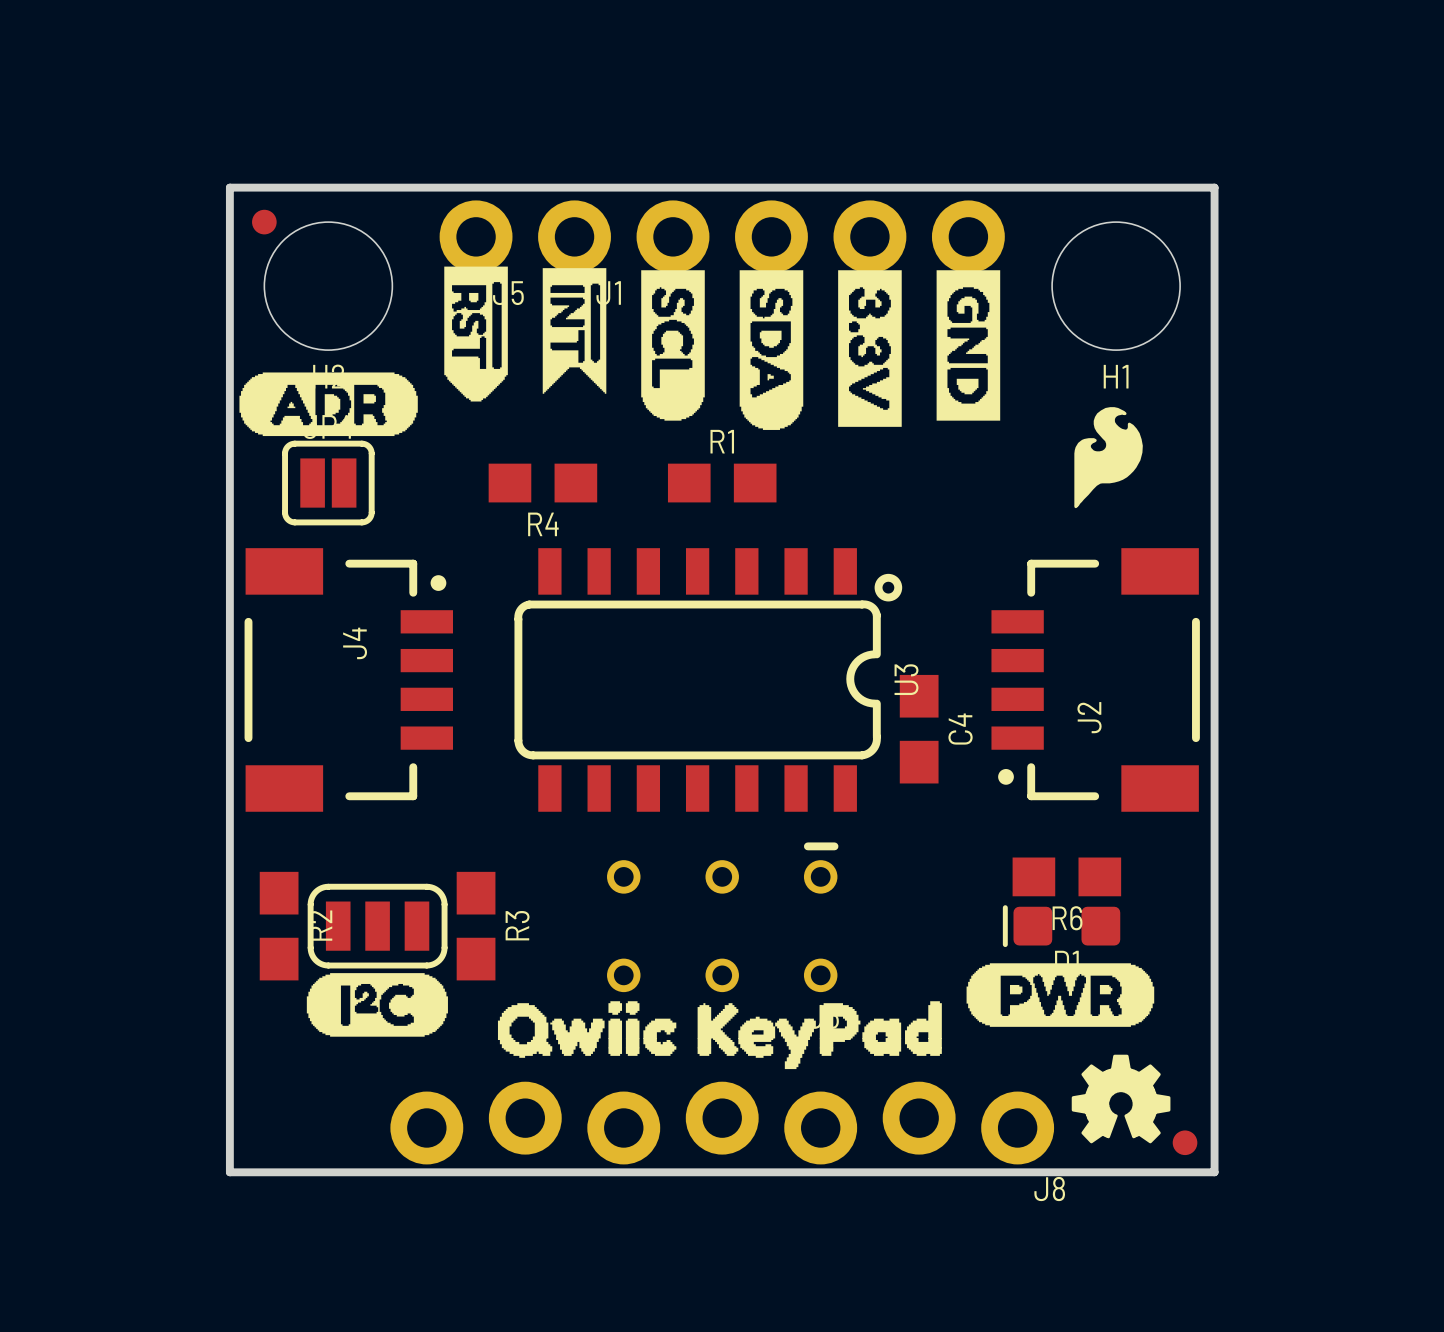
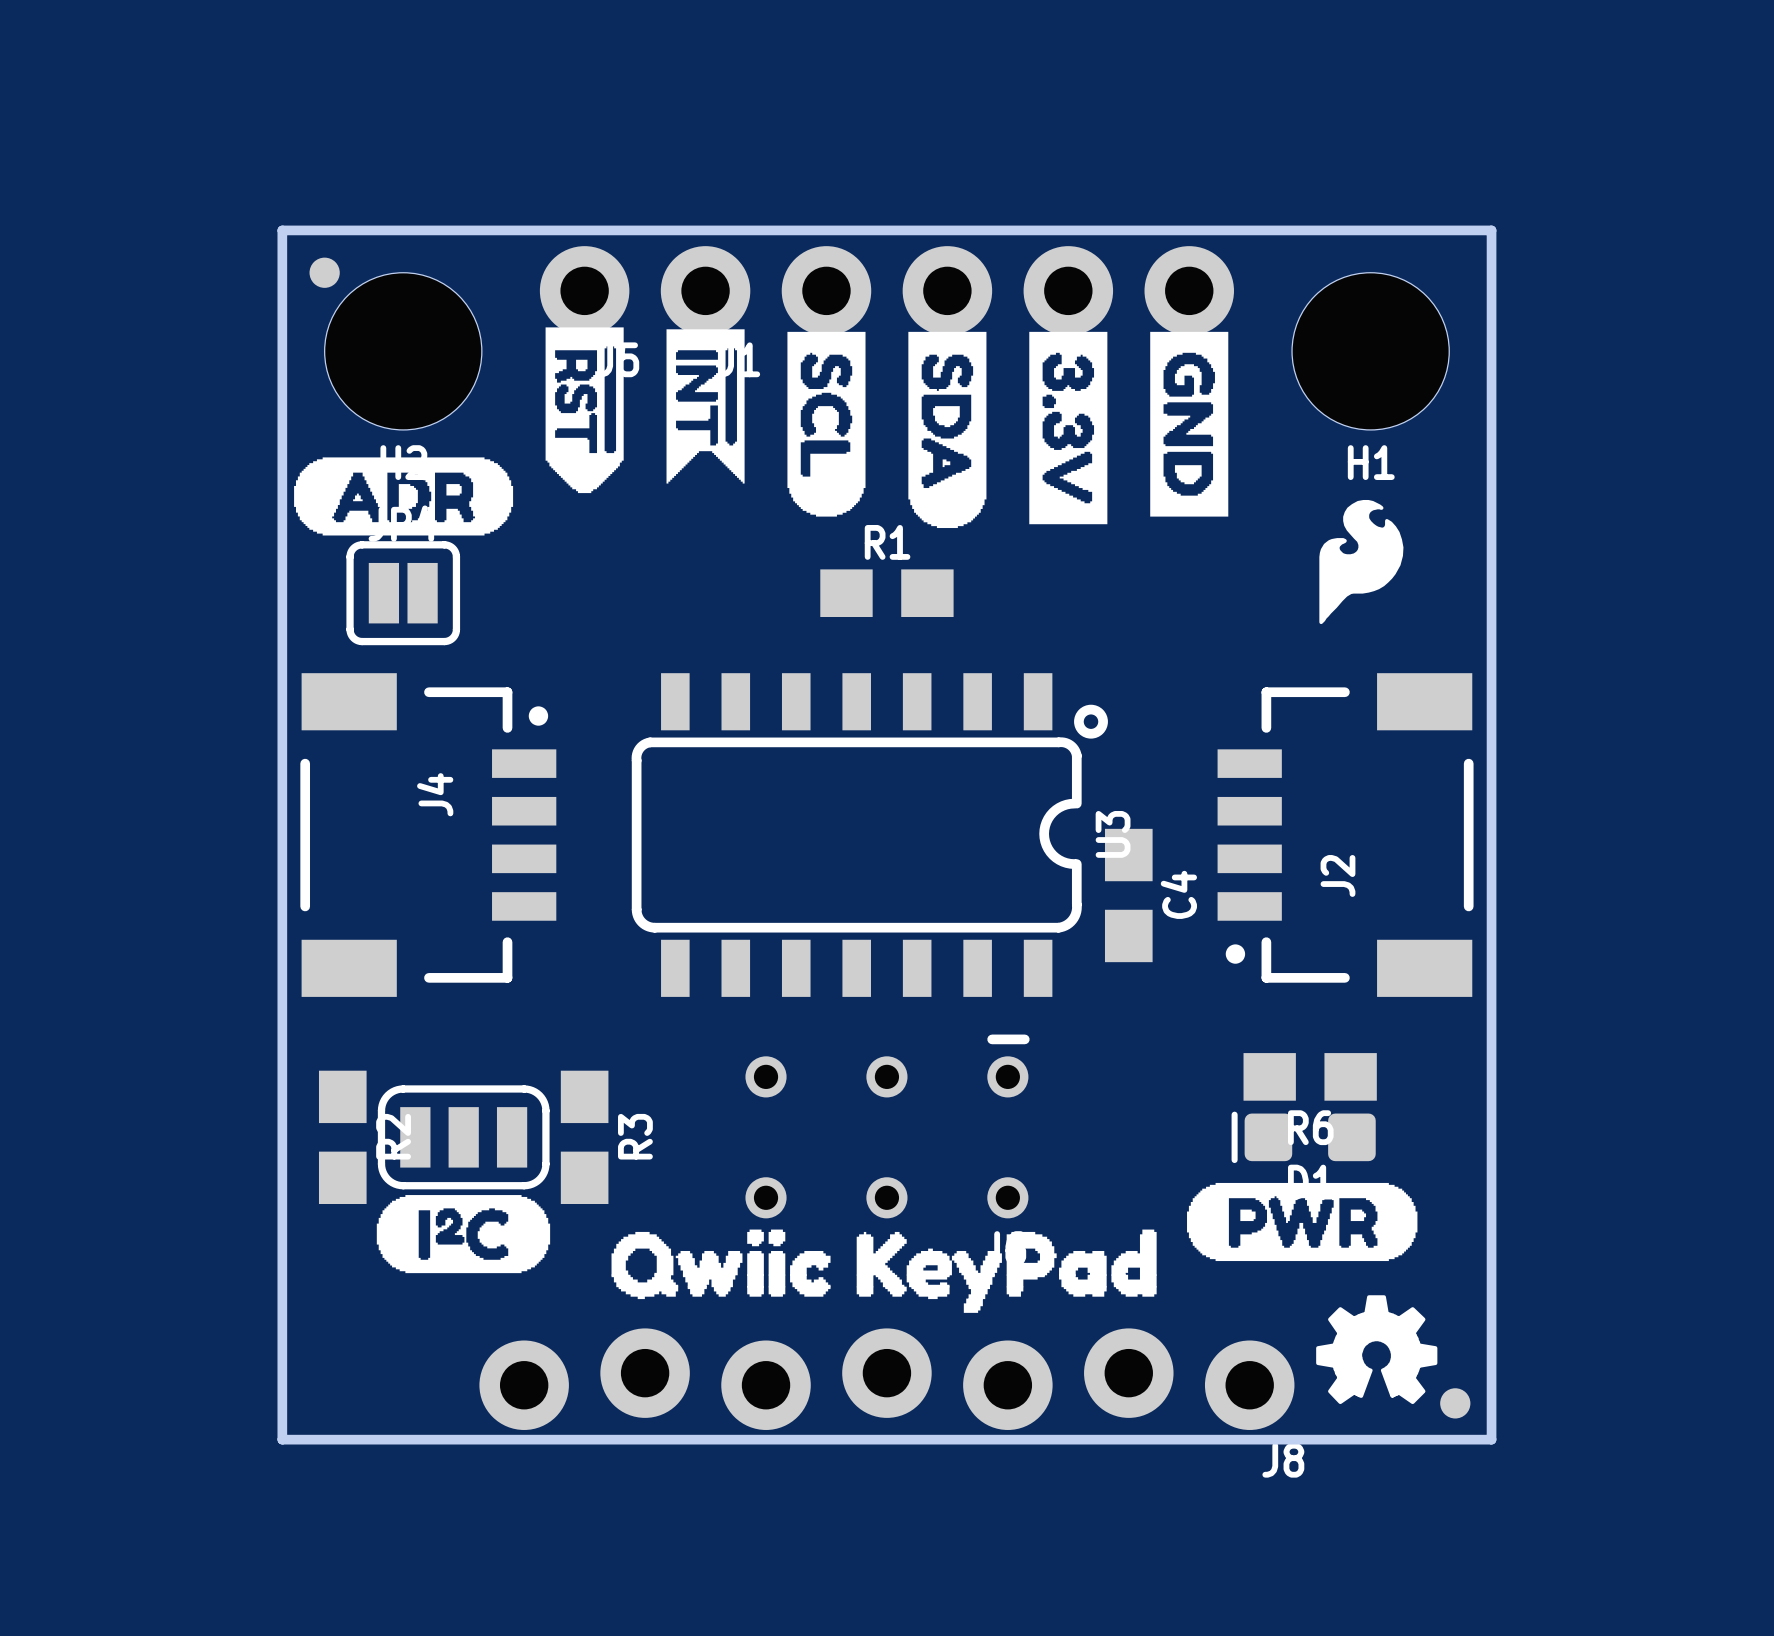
R4: (542, 483) -> none

